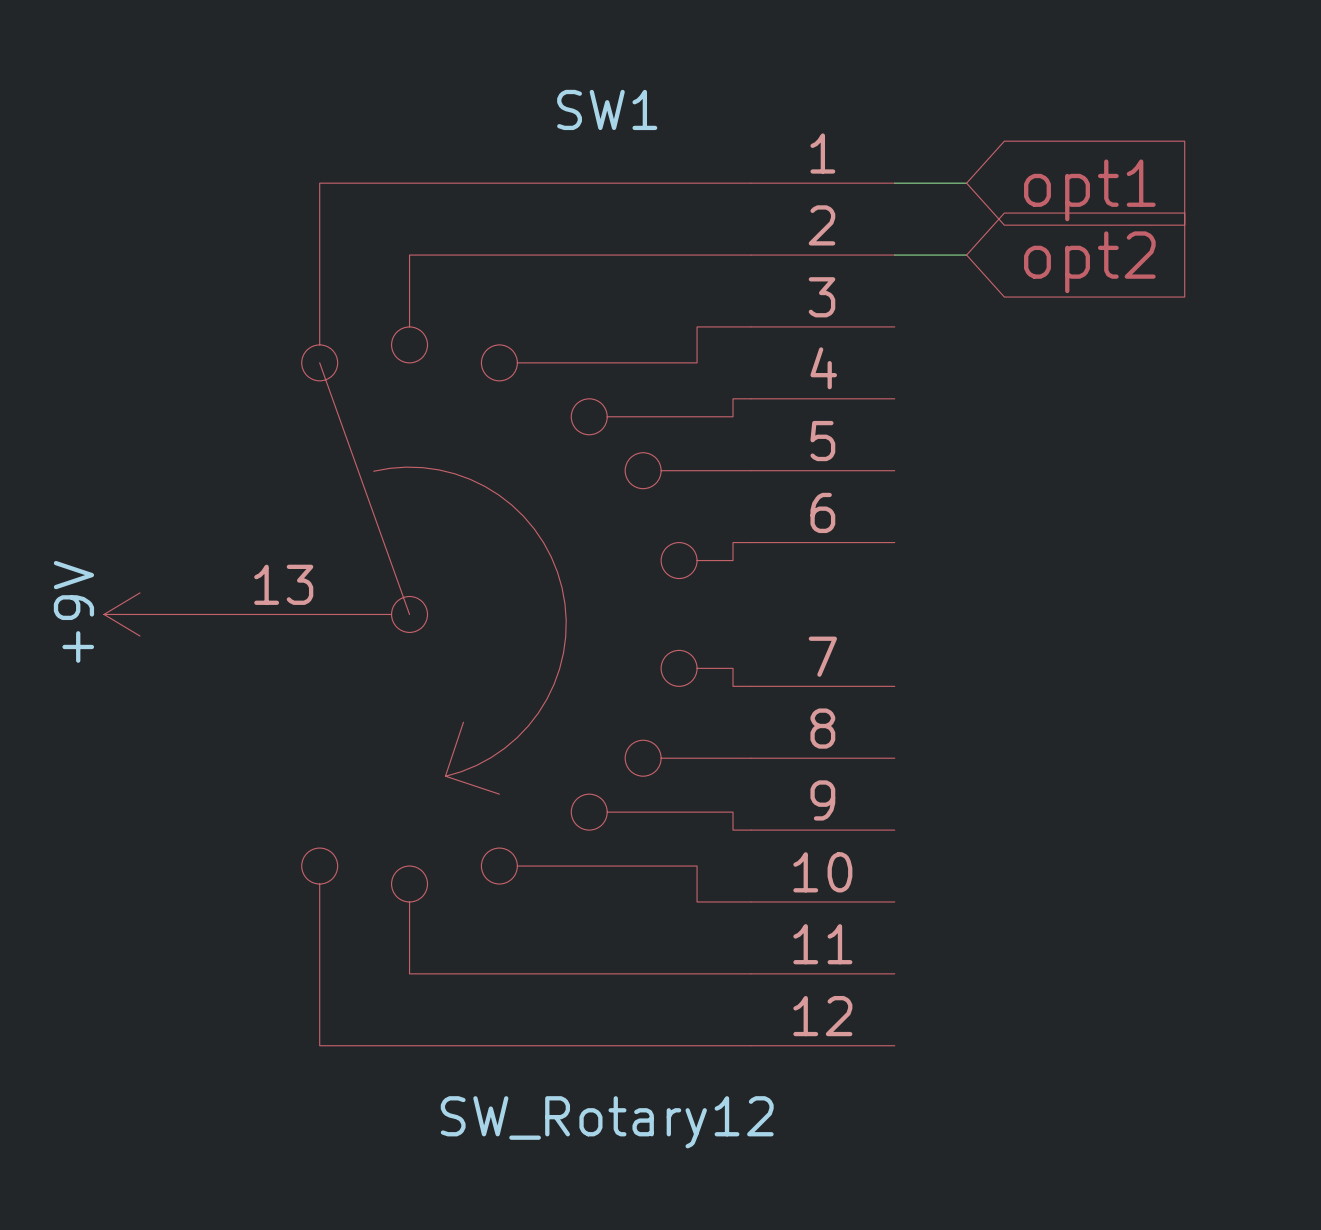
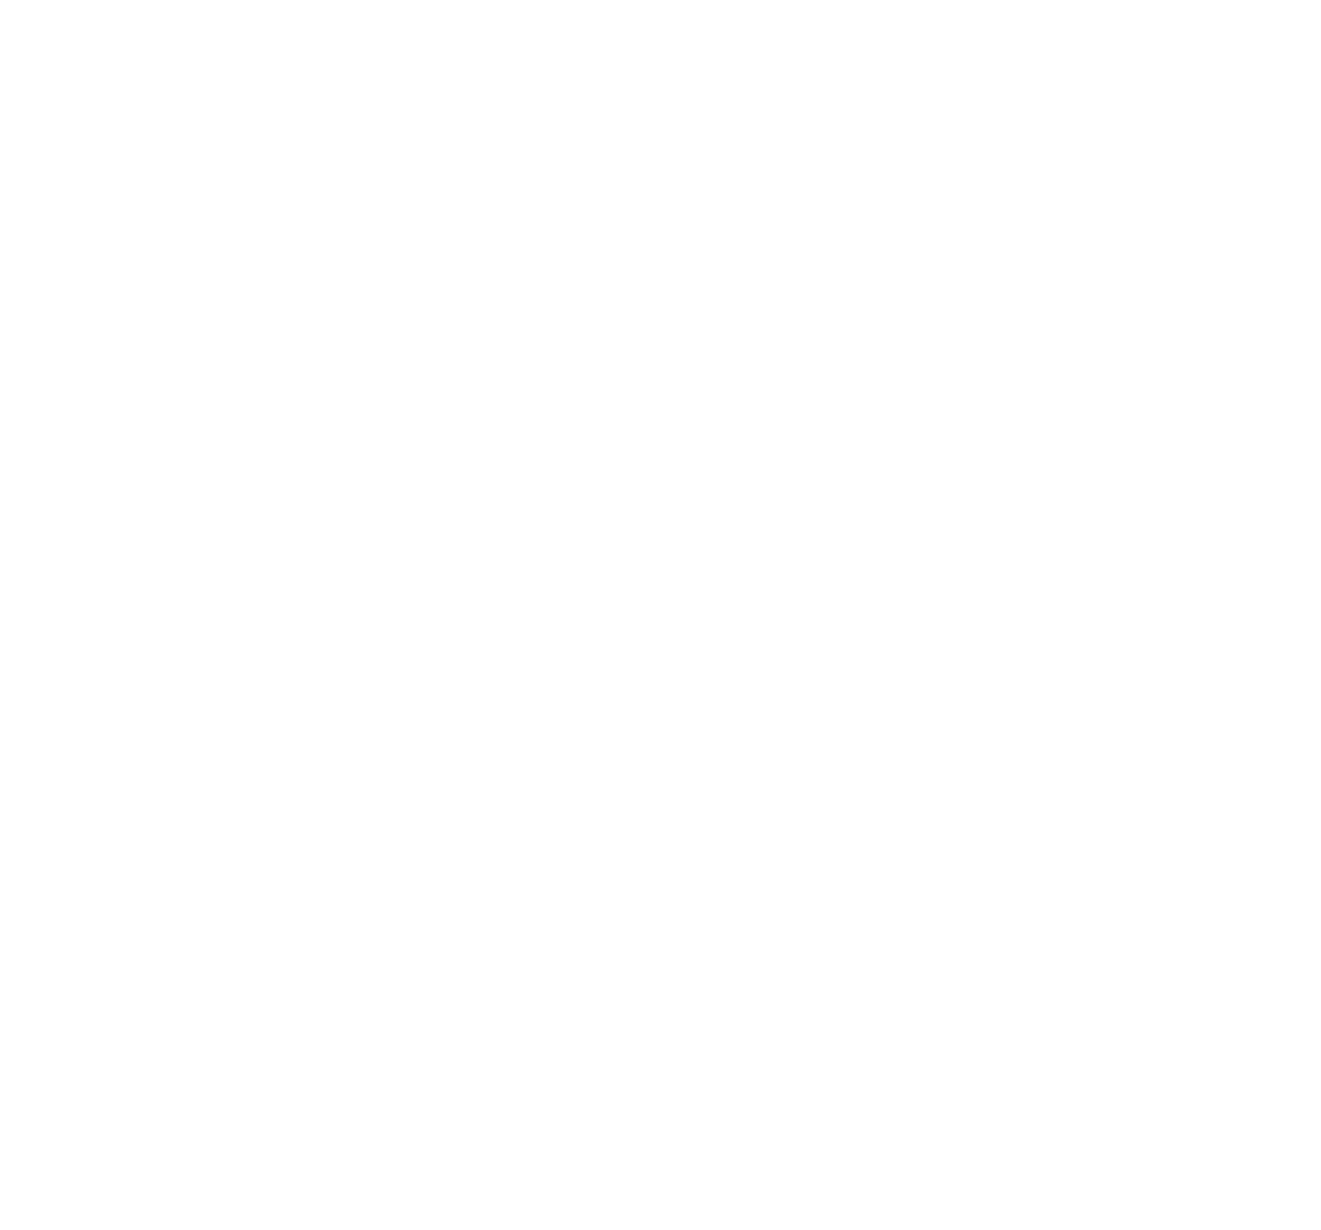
wire: (894, 183) (966, 183) -> none
global label: opt1 (1089, 190) -> none
wire: (894, 255) (966, 255) -> none
global label: opt2 (1089, 262) -> none
power symbol: +9V (139, 614) -> none
SW1: SW_Rotary12 (535, 614) -> none

